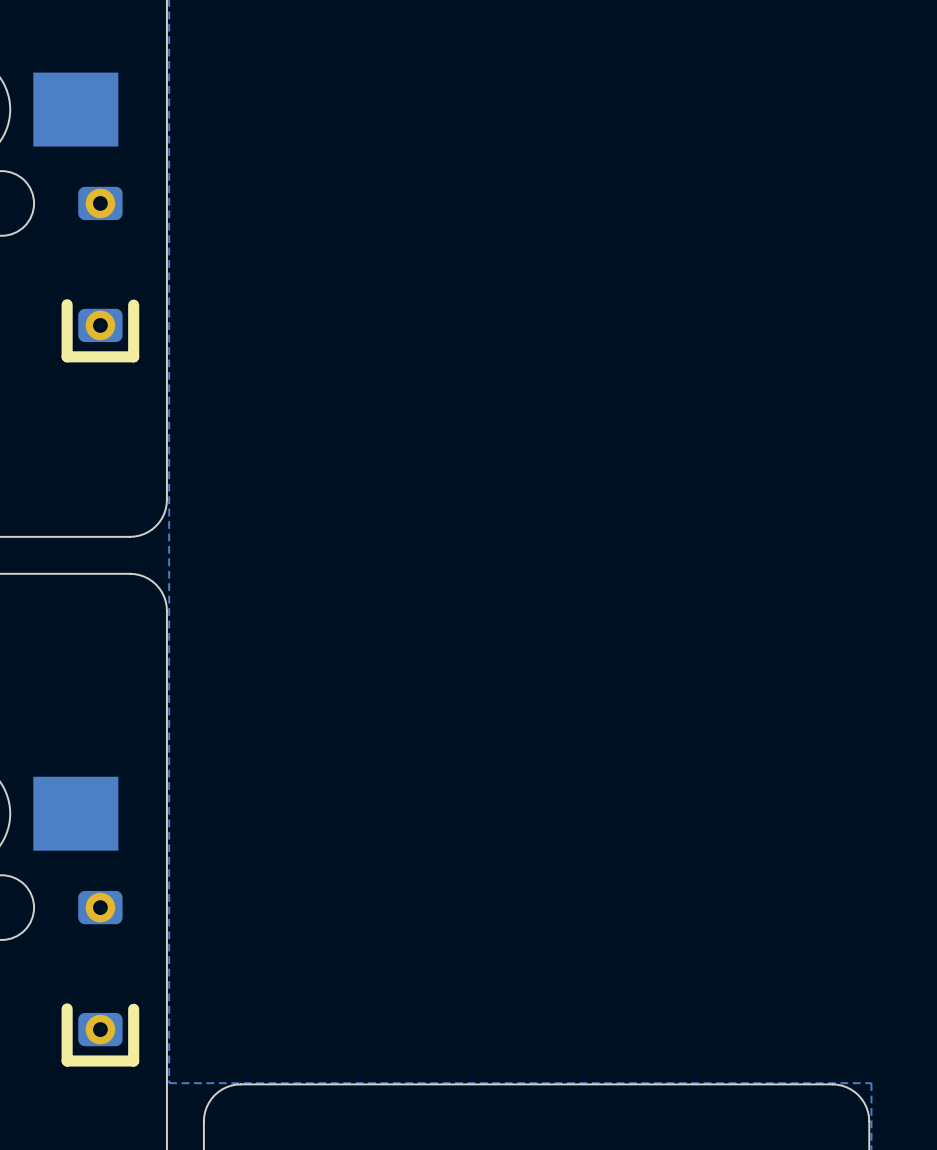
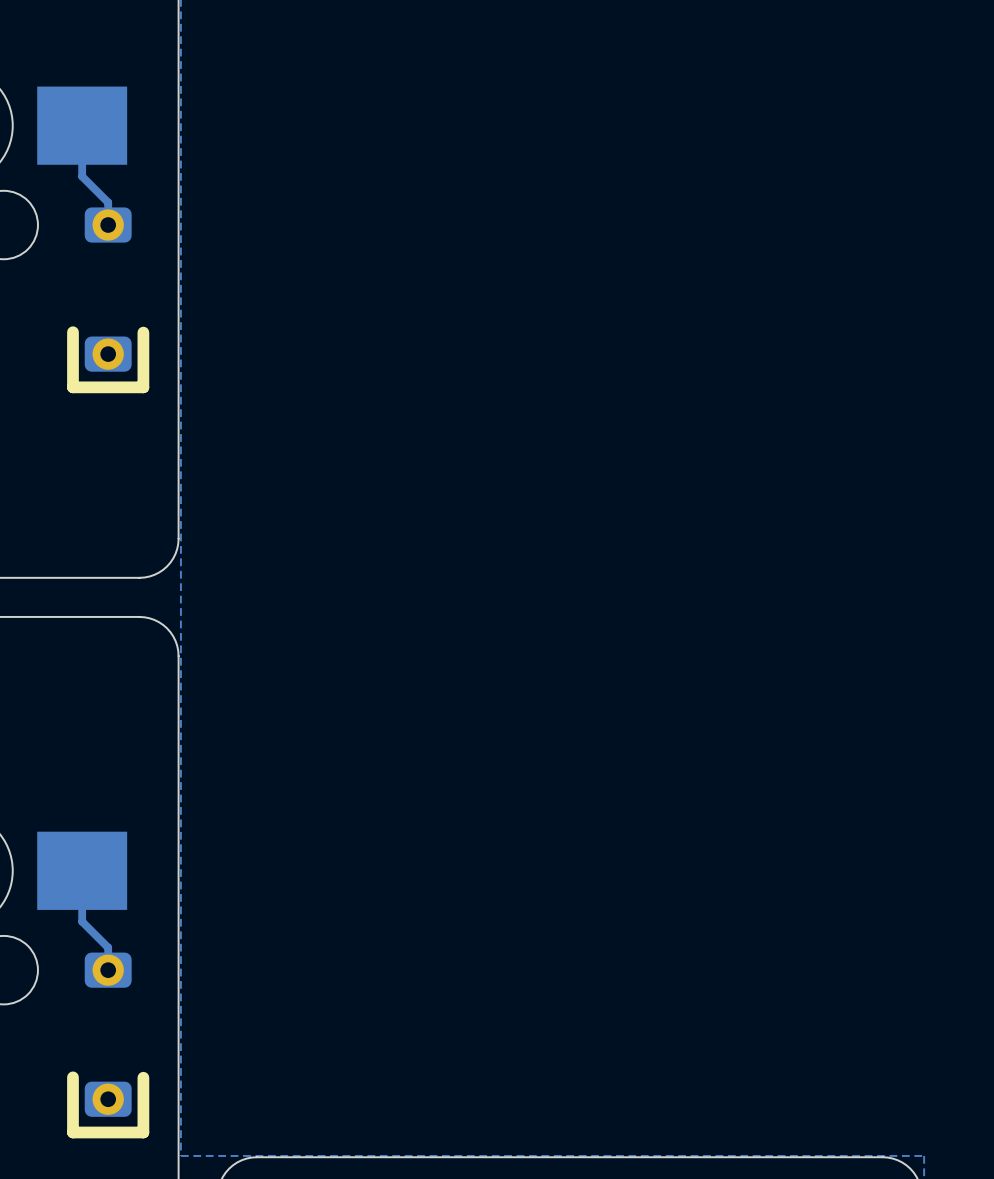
track: none -> (82, 125) (82, 176) (108, 202) (108, 225)
track: none -> (82, 870) (82, 921) (108, 947) (108, 970)

